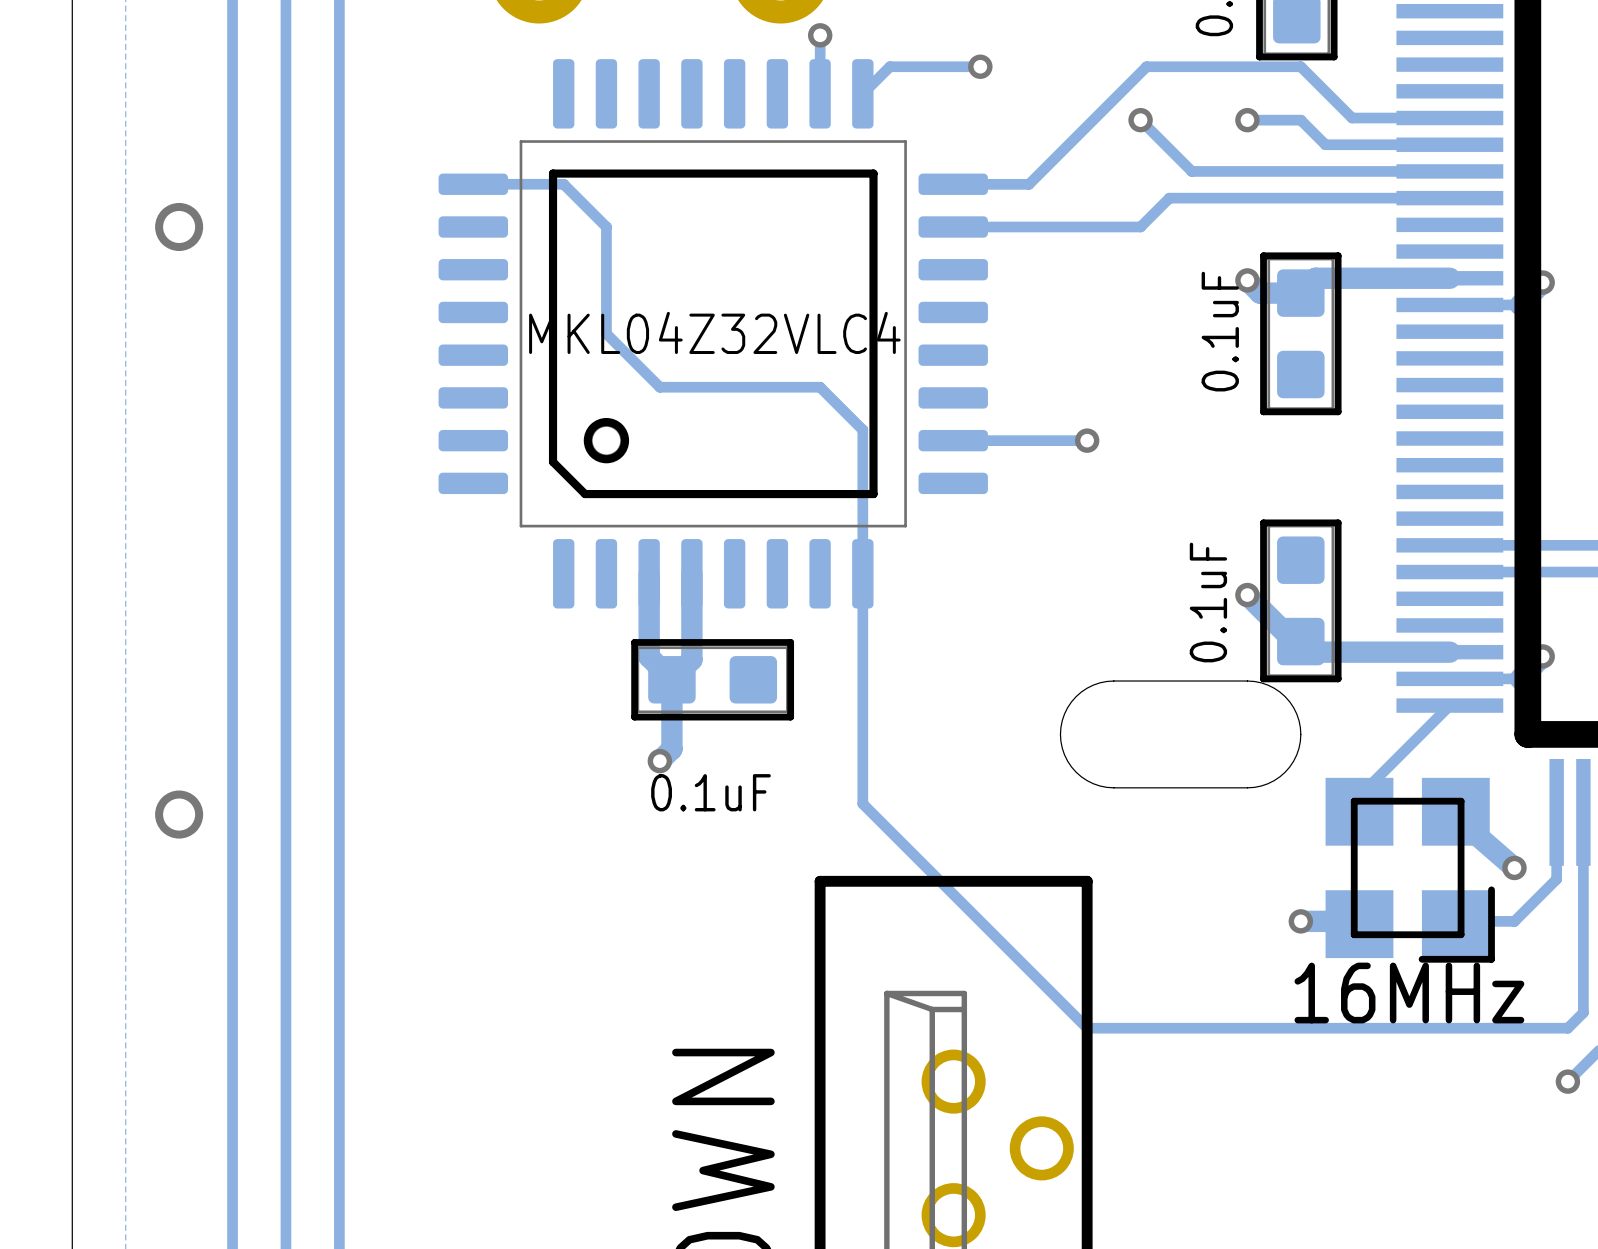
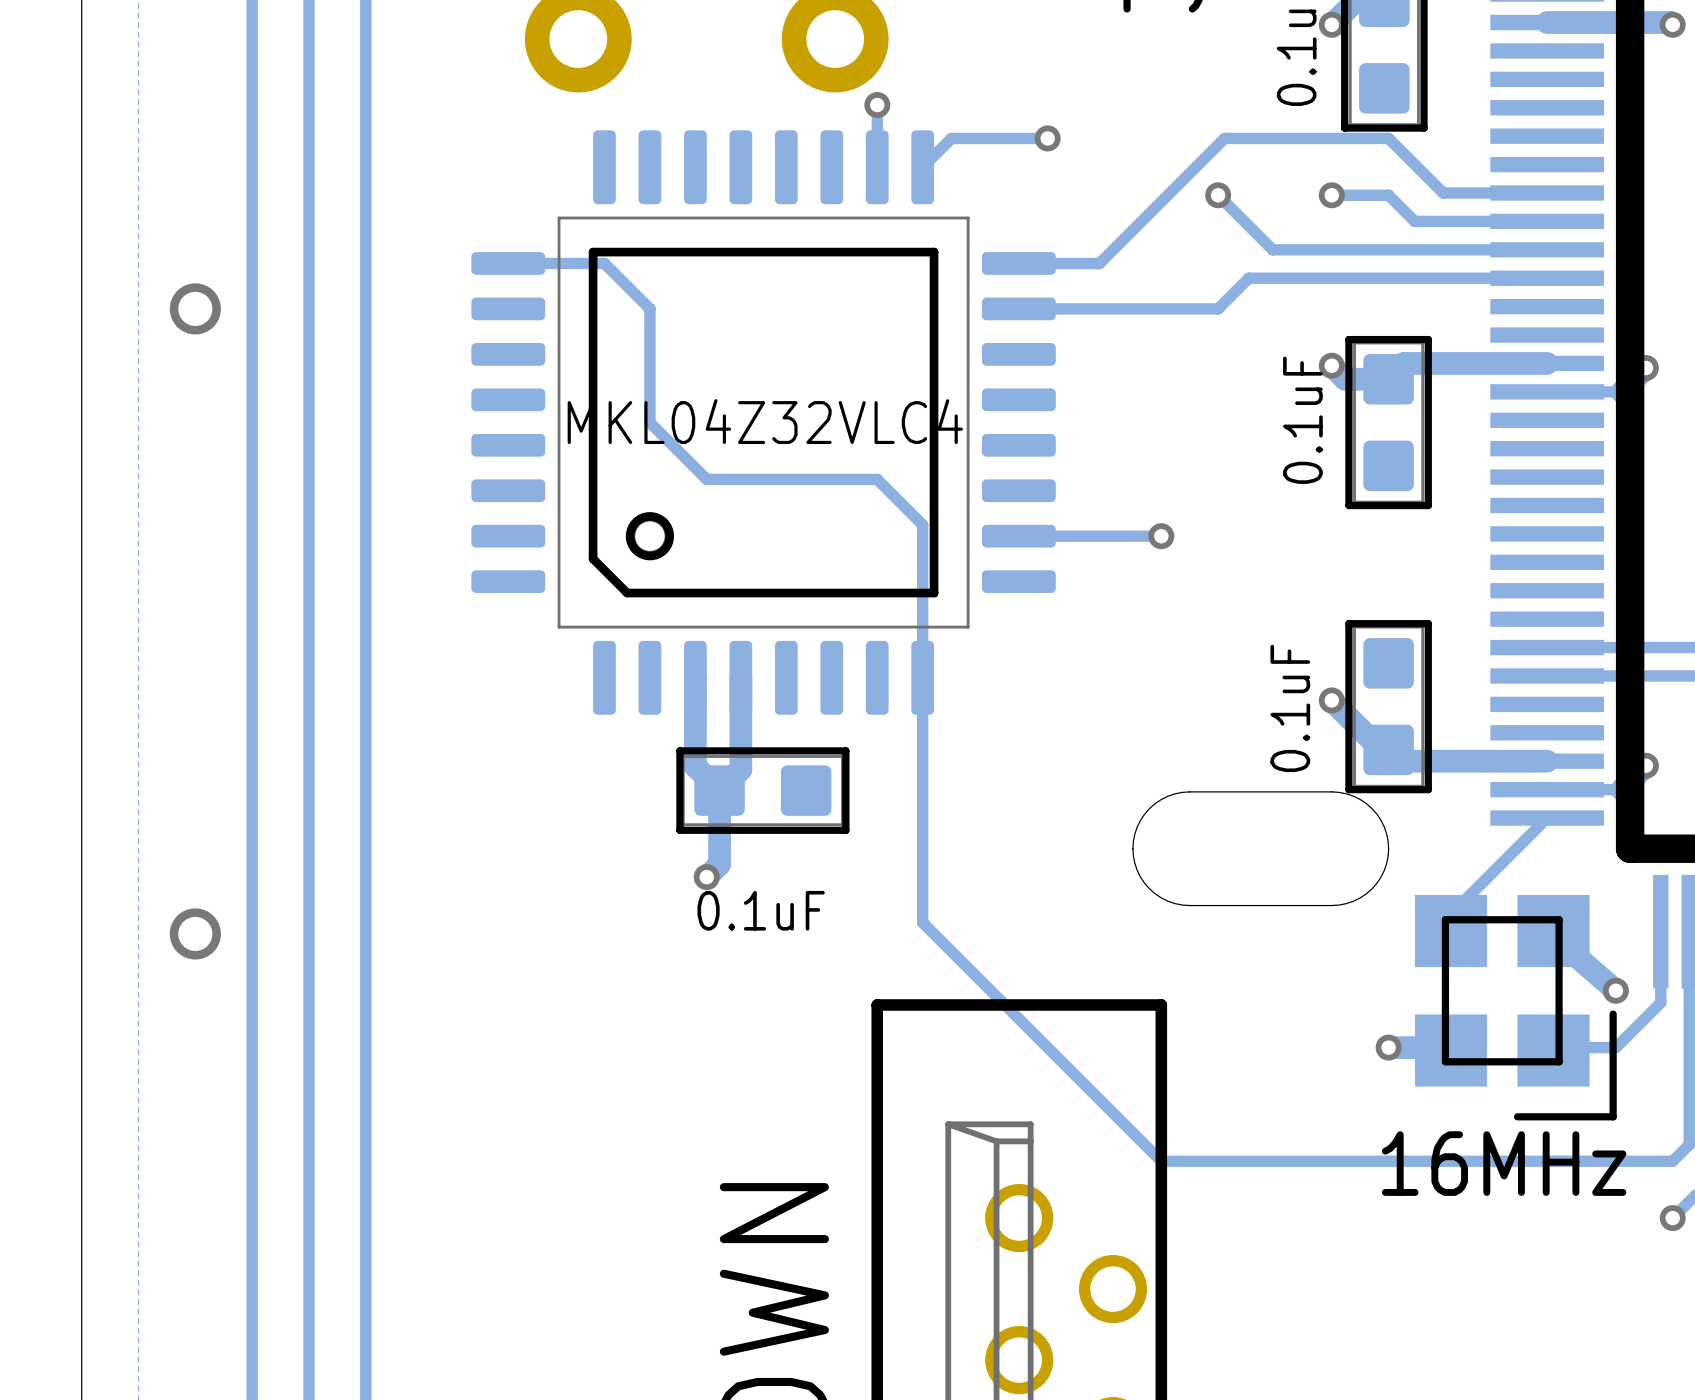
part footprint: [1325, 777, 1495, 963] -> [1414, 894, 1617, 1121]
part value position: 16MHz (1409, 993) -> 16MHz (1504, 1163)

